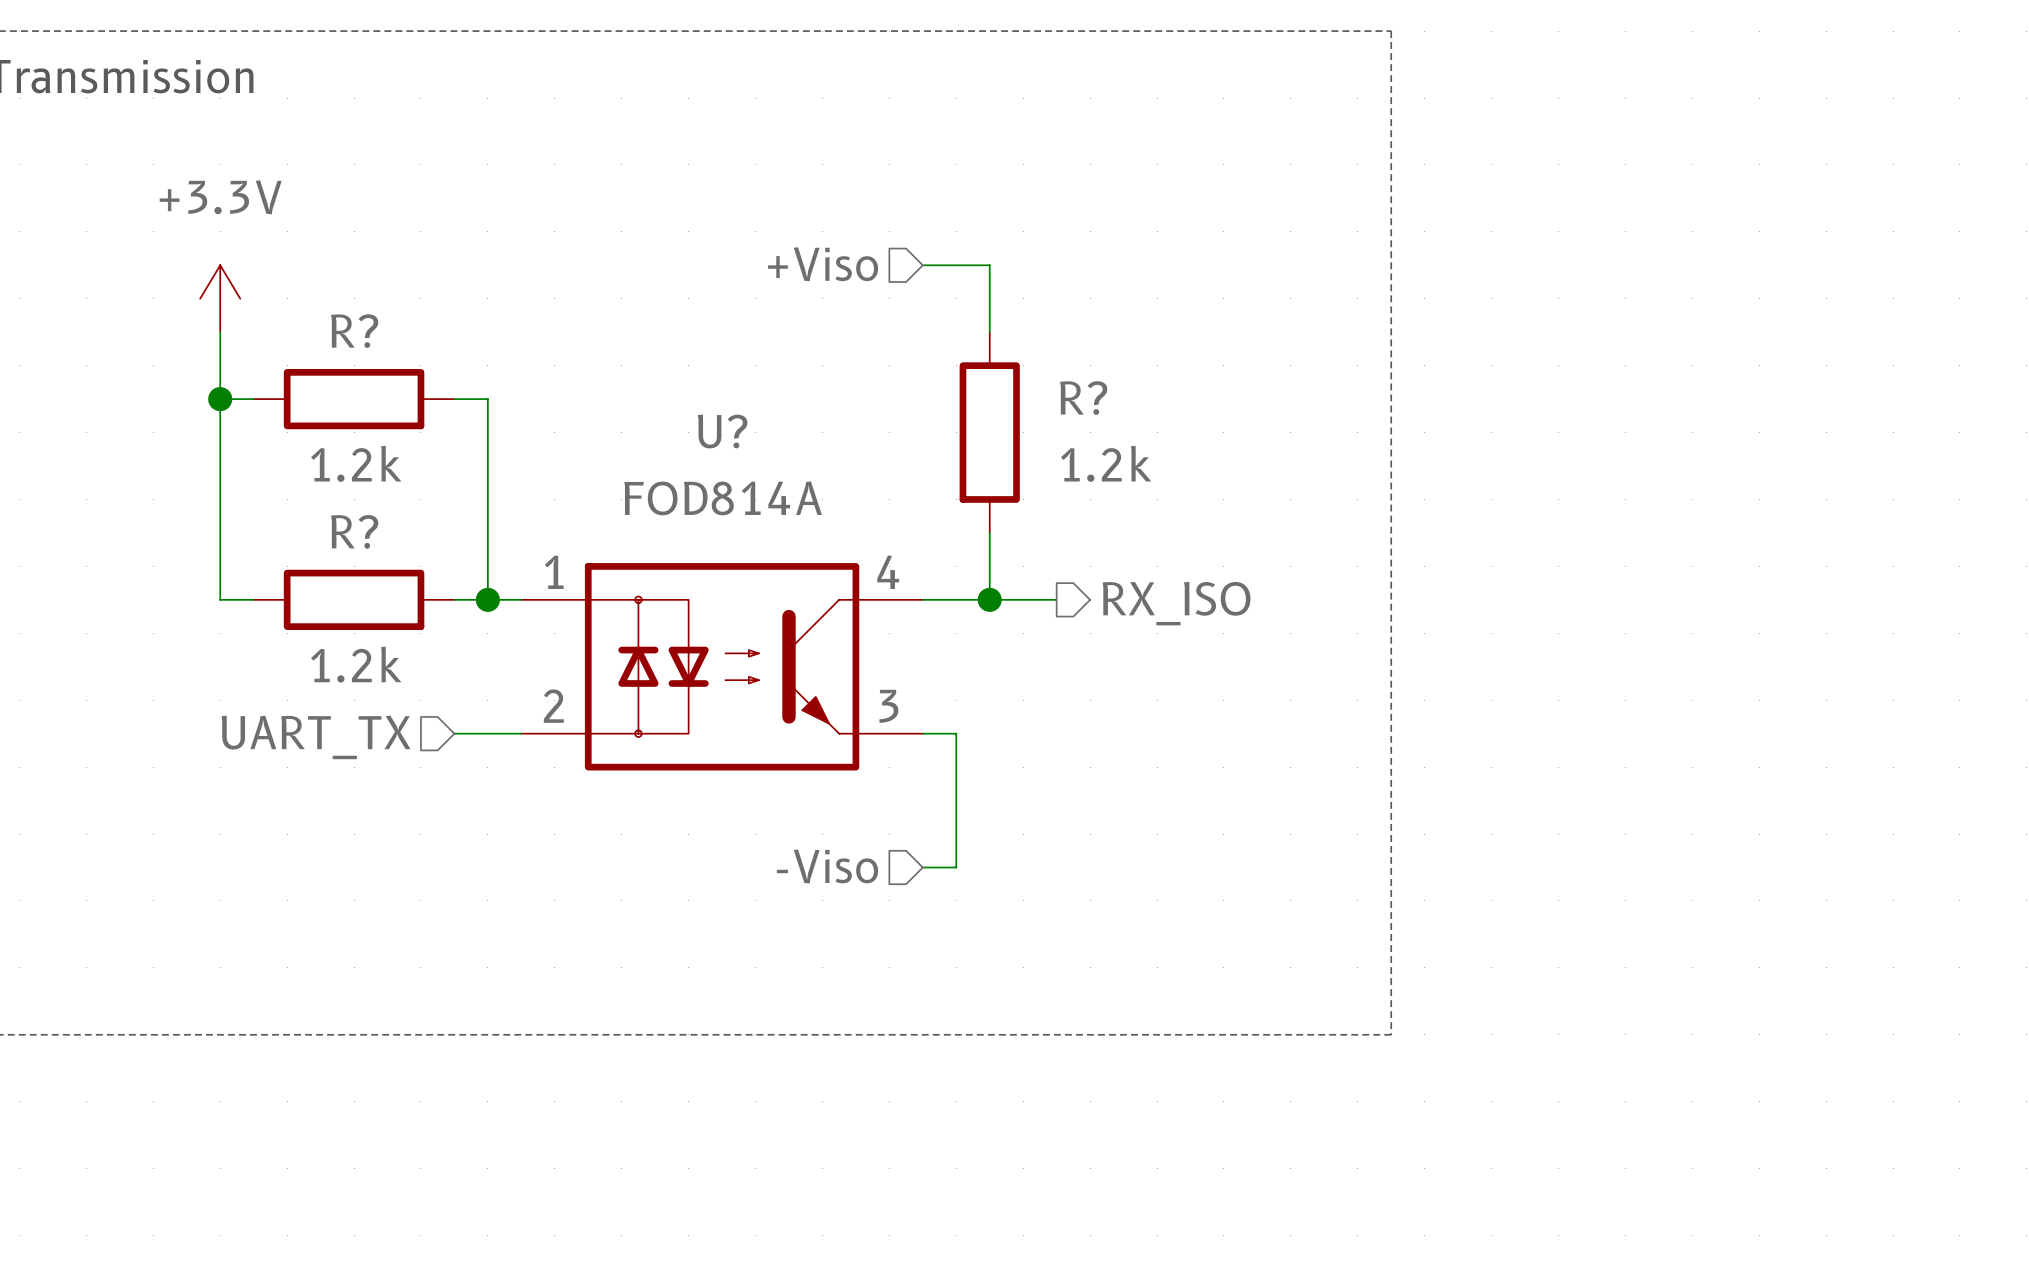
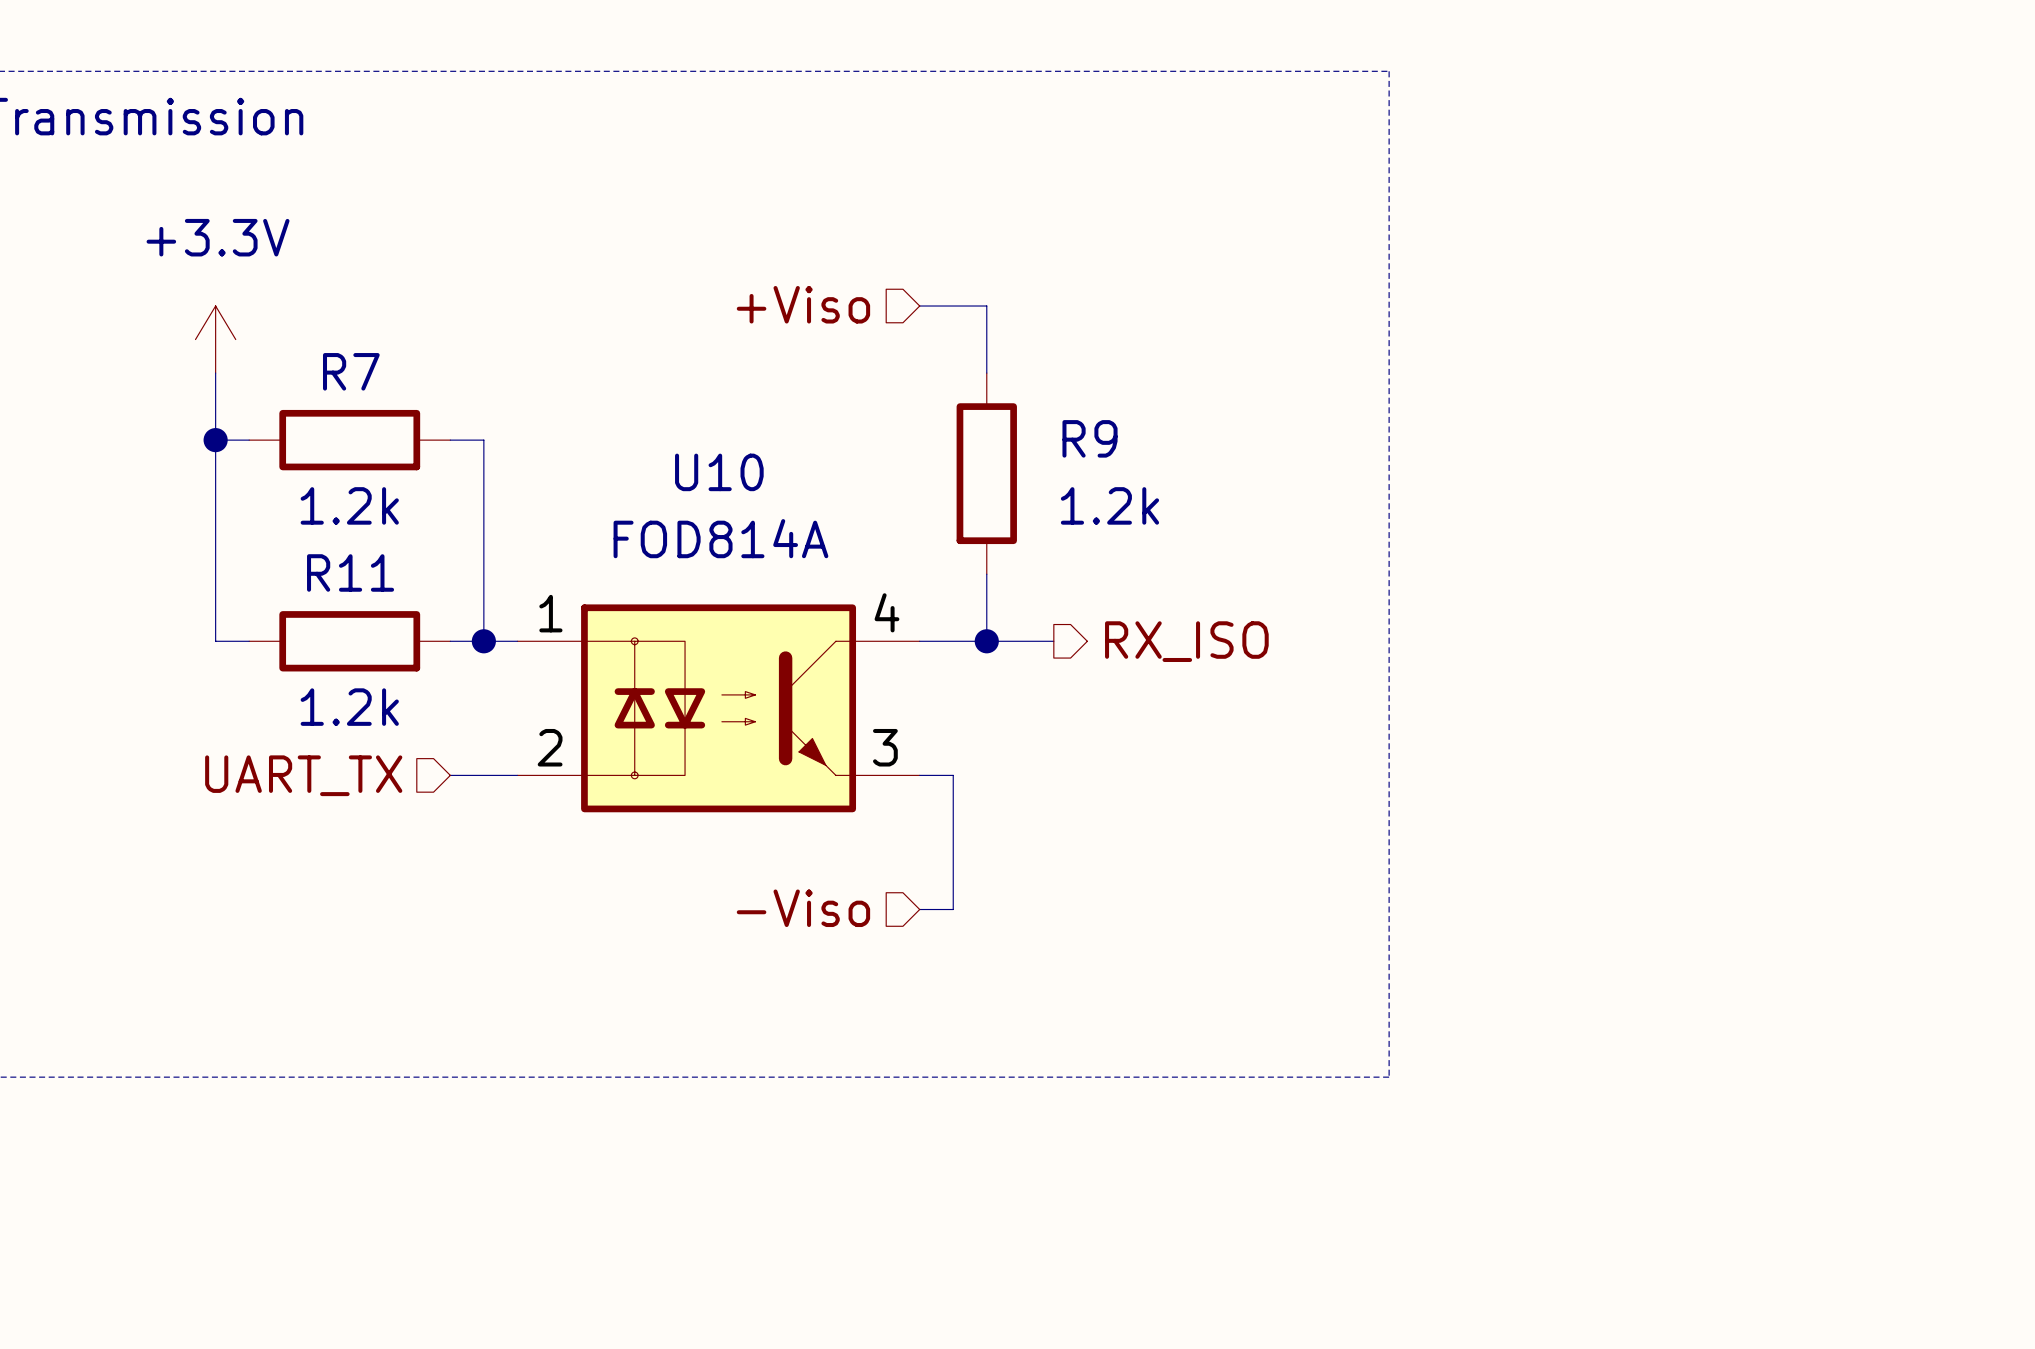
R? name: R? (354, 331) -> R7 (351, 371)
R? name: R? (1083, 398) -> R9 (1090, 438)
U? name: U? (722, 431) -> U10 (719, 472)
R? name: R? (354, 531) -> R11 (350, 572)

